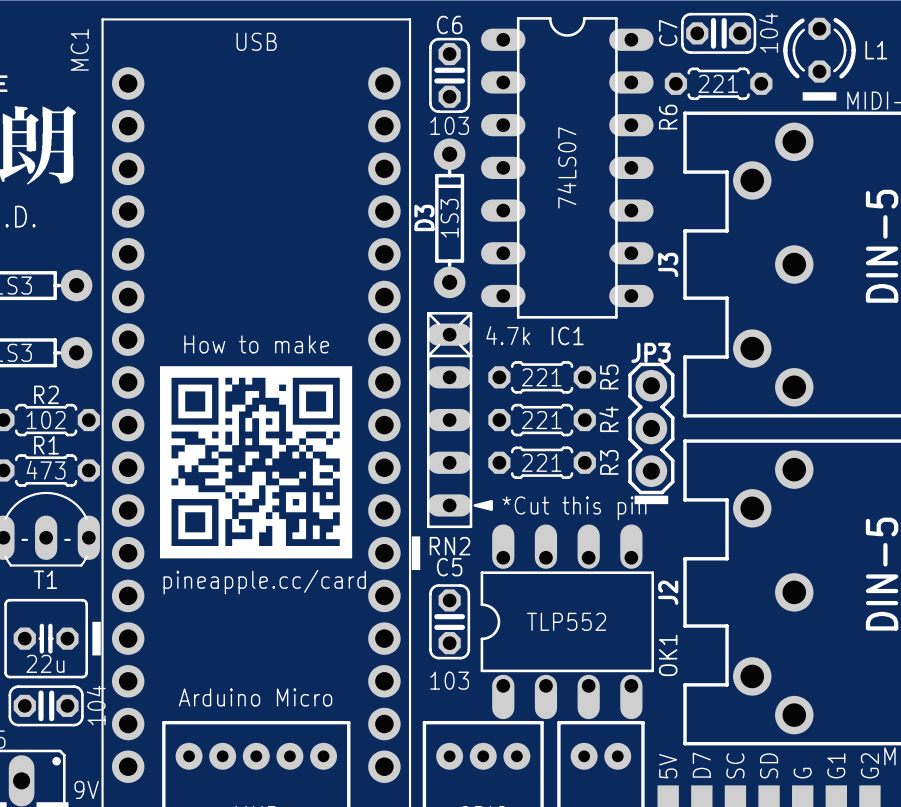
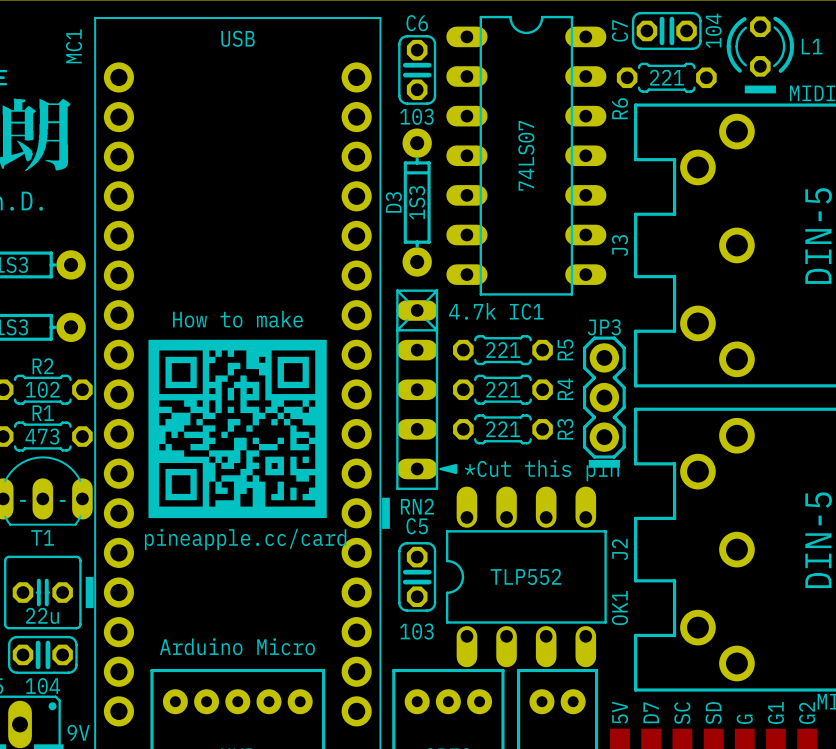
text rotation: 0° (96, 705) -> 90° clockwise (42, 686)
text position: 104 (96, 705) -> 104 (42, 686)

